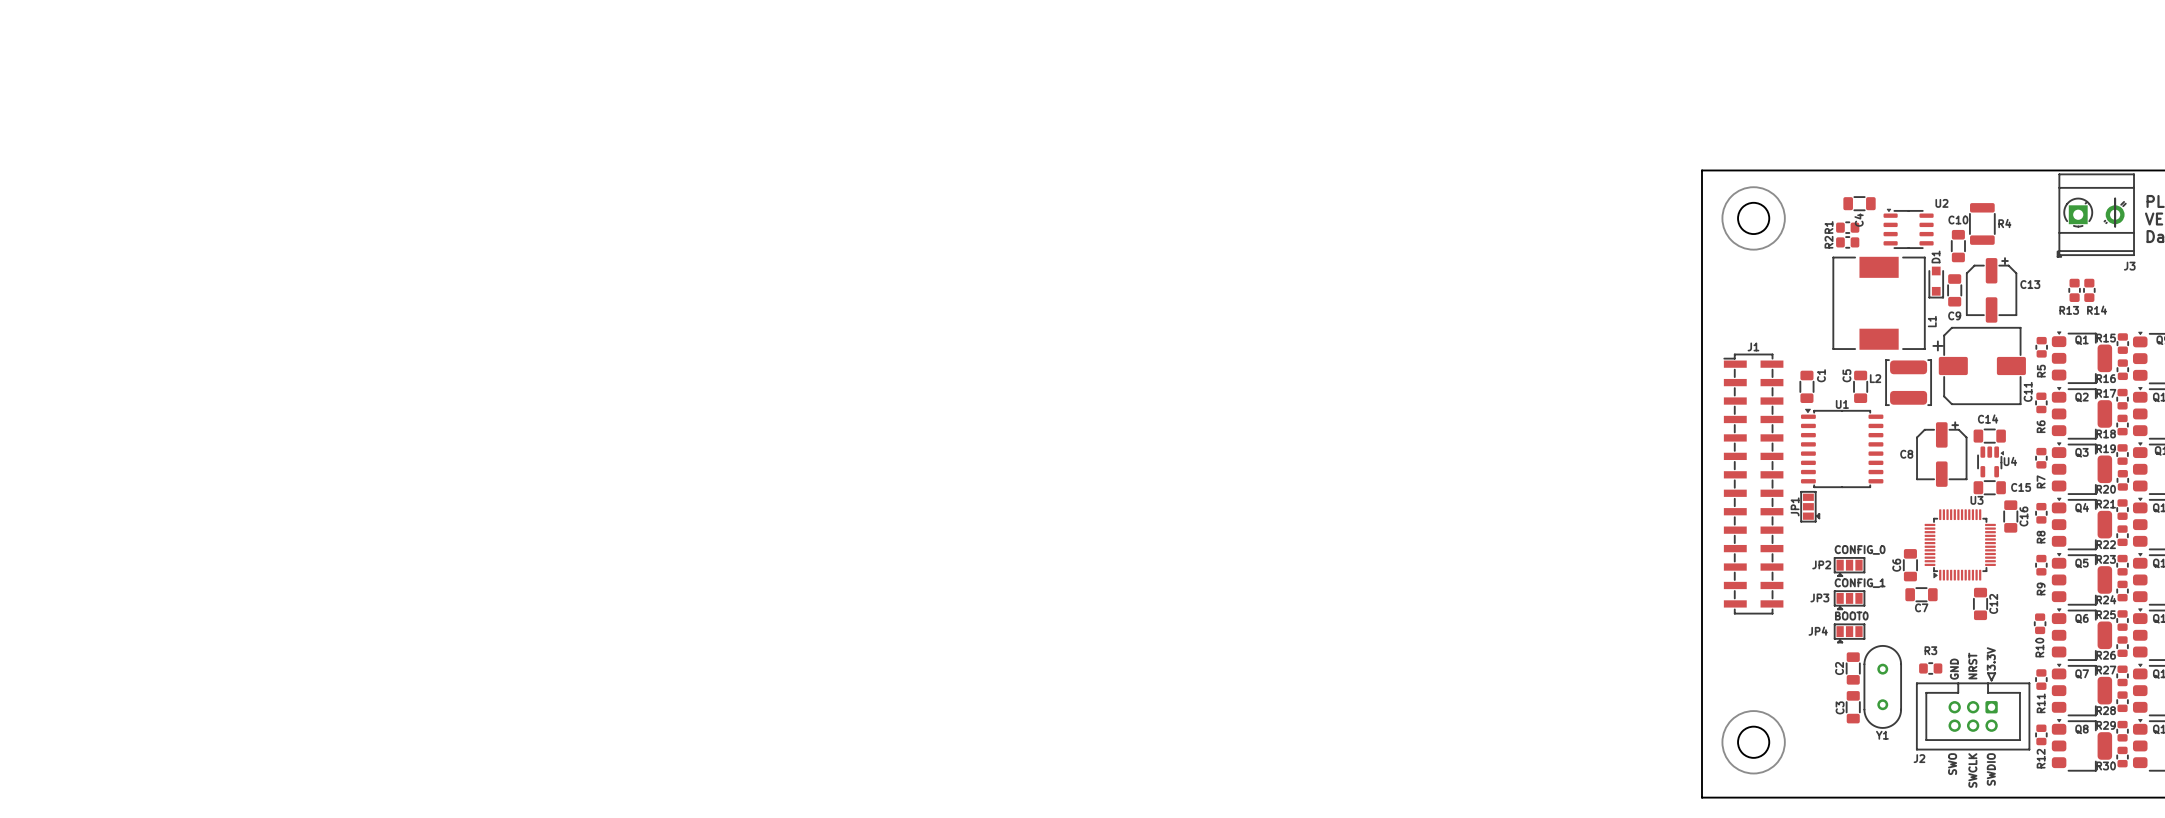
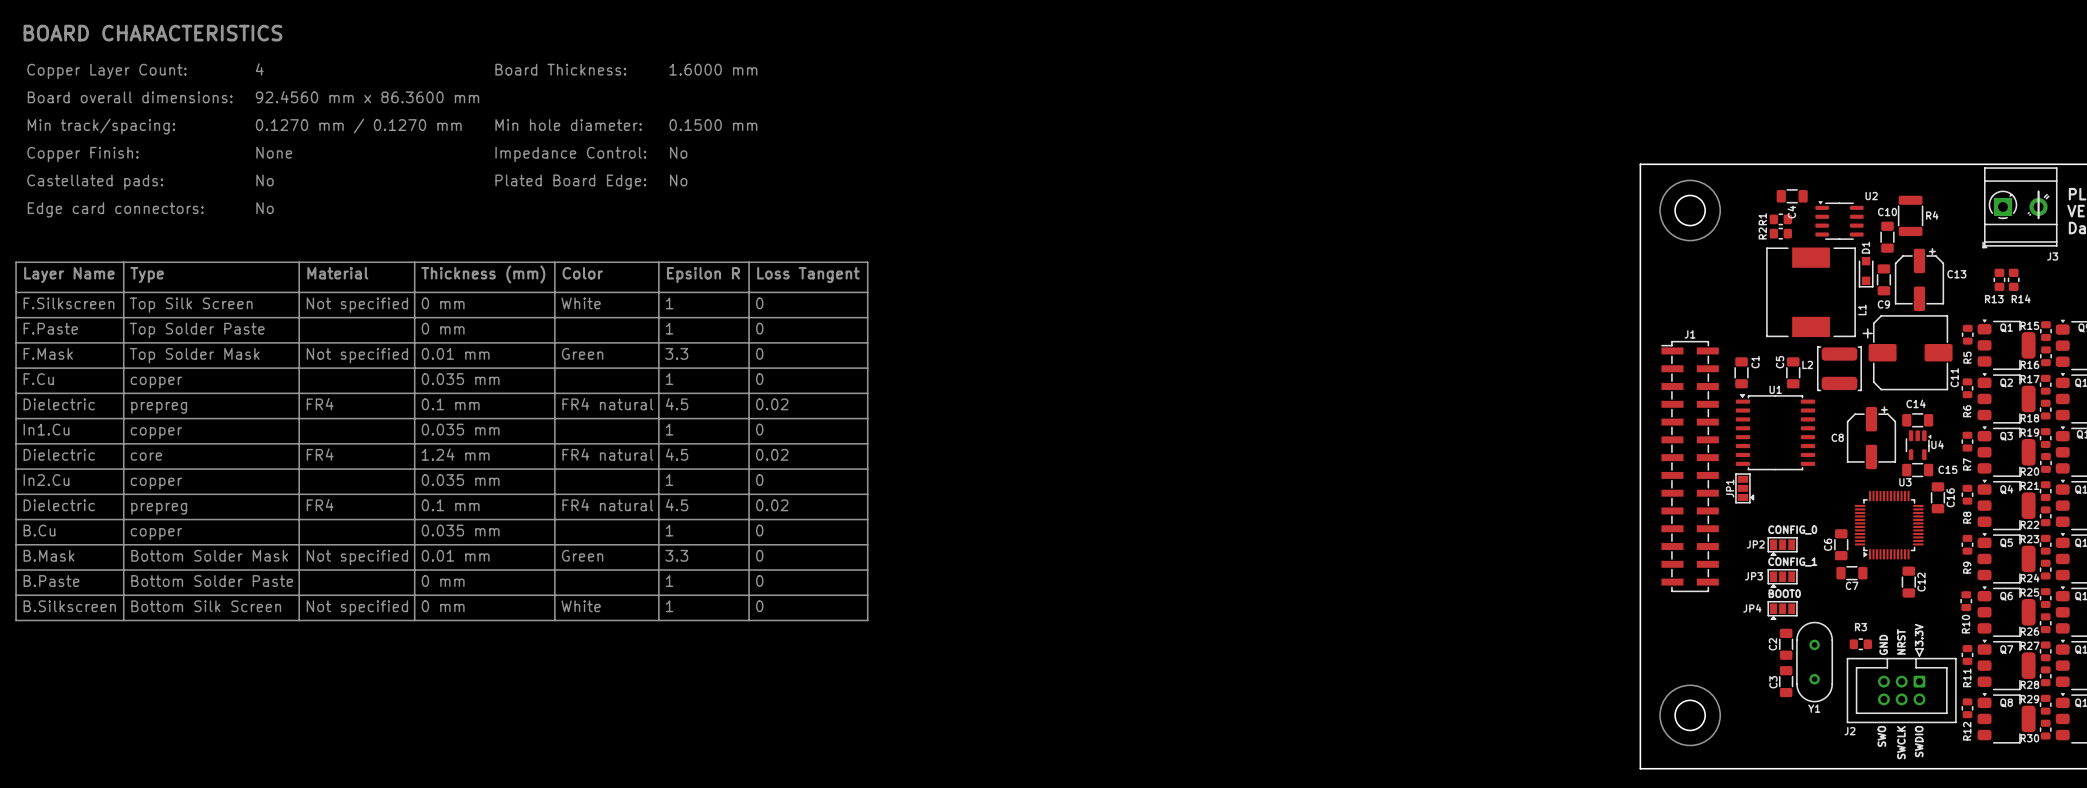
text: none -> BOARD CHARACTERISTICS (152, 33)
text: none -> 4 (259, 69)
text: none -> Board Thickness: (560, 69)
text: none -> 1.6000 mm (713, 69)
text: none -> Copper Layer Count: (106, 71)
text: none -> 92.4560 mm x 86.3600 mm (367, 97)
text: none -> Board overall dimensions: (130, 97)
text: none -> Min hole diameter: (568, 125)
text: none -> 0.1500 mm (713, 125)
text: none -> 0.1270 mm / 0.1270 mm (358, 126)
text: none -> Min track/spacing: (101, 126)
text: none -> None (274, 152)
text: none -> No (678, 152)
text: none -> Copper Finish: (82, 154)
text: none -> Impedance Control: (570, 154)
text: none -> No (265, 180)
text: none -> No (678, 180)
text: none -> Castellated pads: (95, 182)
text: none -> Plated Board Edge: (570, 182)
text: none -> No (265, 208)
text: none -> Edge card connectors: (115, 209)
line: none -> (16, 262) (867, 262) (867, 620) (16, 620) (16, 262)
line: none -> (123, 262) (123, 620)
line: none -> (299, 262) (299, 620)
line: none -> (414, 262) (414, 620)
line: none -> (554, 262) (554, 620)
line: none -> (658, 262) (658, 620)
line: none -> (749, 262) (749, 620)
text: none -> Material (337, 273)
text: none -> Color (582, 273)
text: none -> Thickness (mm) (483, 274)
text: none -> Layer Name (69, 275)
text: none -> Type (147, 275)
text: none -> Epsilon R (703, 275)
text: none -> Loss Tangent (808, 275)
line: none -> (16, 292) (867, 292)
text: none -> F.Silkscreen (69, 303)
text: none -> 0 mm (443, 303)
text: none -> White (581, 303)
text: none -> 1 (669, 303)
text: none -> 0 (759, 303)
text: none -> Top Silk Screen (191, 305)
text: none -> Not specified (357, 305)
line: none -> (16, 317) (867, 317)
text: none -> F.Paste (50, 328)
text: none -> 0 mm (443, 328)
text: none -> 1 (669, 328)
text: none -> 0 (759, 328)
text: none -> Top Solder Paste (197, 330)
line: none -> (16, 342) (867, 342)
text: none -> F.Mask (48, 353)
text: none -> 0.01 mm (455, 353)
text: none -> Green (582, 353)
text: none -> 3.3 (676, 353)
text: none -> 0 (759, 353)
text: none -> Top Solder Mask (194, 355)
text: none -> Not specified (357, 355)
line: none -> (16, 368) (867, 368)
text: none -> F.Cu (38, 379)
text: none -> 0.035 mm (460, 379)
text: none -> 1 (669, 379)
text: none -> 0 (759, 379)
text: none -> copper (156, 382)
line: none -> (16, 393) (867, 393)
text: none -> Dielectric (59, 404)
text: none -> FR4 (320, 404)
text: none -> 0.1 mm (450, 404)
text: none -> FR4 natural (607, 404)
text: none -> 4.5 (677, 404)
text: none -> 0.02 (772, 404)
text: none -> prepreg (159, 407)
line: none -> (16, 418) (867, 418)
text: none -> In1.Cu (46, 429)
text: none -> 0.035 mm (460, 429)
text: none -> 1 (669, 429)
text: none -> 0 (759, 429)
text: none -> copper (156, 433)
line: none -> (16, 443) (867, 443)
text: none -> Dielectric (59, 454)
text: none -> FR4 (320, 454)
text: none -> 1.24 mm (455, 454)
text: none -> FR4 natural (607, 454)
text: none -> 4.5 (677, 454)
text: none -> 0.02 (772, 454)
text: none -> core (146, 456)
line: none -> (16, 469) (867, 469)
text: none -> In2.Cu (46, 480)
text: none -> 0.035 mm (460, 480)
text: none -> 1 (669, 480)
text: none -> 0 (759, 480)
text: none -> copper (156, 483)
line: none -> (16, 494) (867, 494)
text: none -> Dielectric (59, 505)
text: none -> FR4 (320, 505)
text: none -> 0.1 mm (450, 505)
text: none -> FR4 natural (607, 505)
text: none -> 4.5 (677, 505)
text: none -> 0.02 (772, 505)
text: none -> prepreg (159, 508)
line: none -> (16, 519) (867, 519)
text: none -> B.Cu (39, 530)
text: none -> 0.035 mm (460, 530)
text: none -> 1 (669, 530)
text: none -> 0 (759, 530)
text: none -> copper (156, 534)
line: none -> (16, 544) (867, 544)
text: none -> B.Mask (49, 555)
text: none -> Bottom Solder Mask (209, 555)
text: none -> 0.01 mm (455, 555)
text: none -> Green (582, 555)
text: none -> 3.3 (676, 555)
text: none -> 0 (759, 555)
text: none -> Not specified (357, 557)
line: none -> (16, 570) (867, 570)
text: none -> B.Paste (51, 581)
text: none -> Bottom Solder Paste (212, 581)
text: none -> 0 mm (443, 581)
text: none -> 1 (669, 581)
text: none -> 0 (759, 581)
line: none -> (16, 595) (867, 595)
text: none -> B.Silkscreen (69, 606)
text: none -> Bottom Silk Screen (206, 606)
text: none -> 0 mm (443, 606)
text: none -> White (581, 606)
text: none -> 1 (669, 606)
text: none -> 0 (759, 606)
text: none -> Not specified (357, 608)

